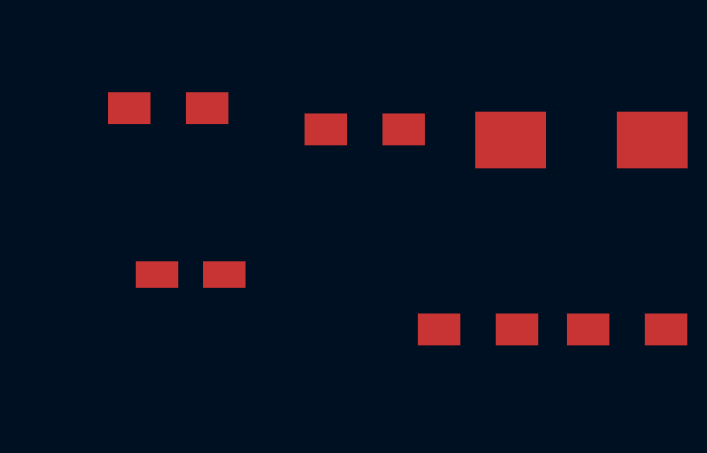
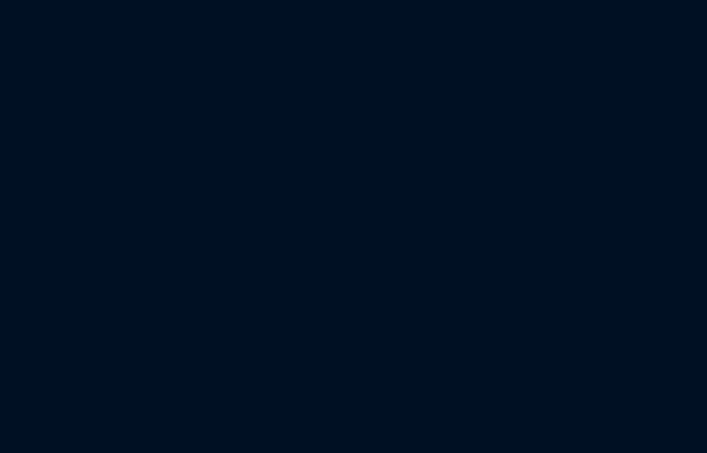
part: (168, 108) -> none
part: (364, 129) -> none
part: (581, 140) -> none
part: (190, 274) -> none
part: (478, 329) -> none
part: (627, 329) -> none

